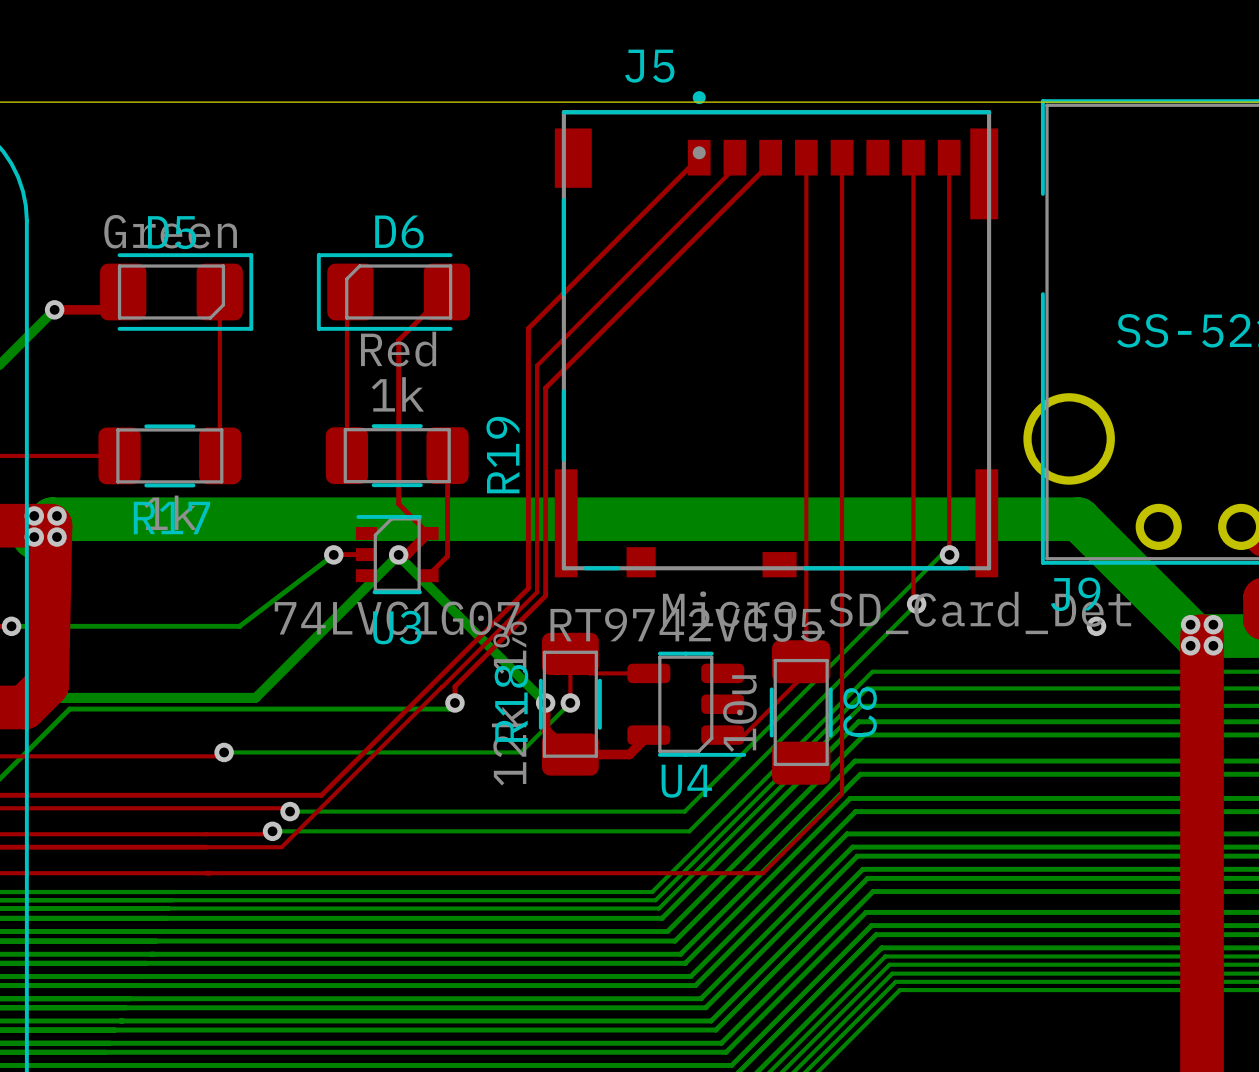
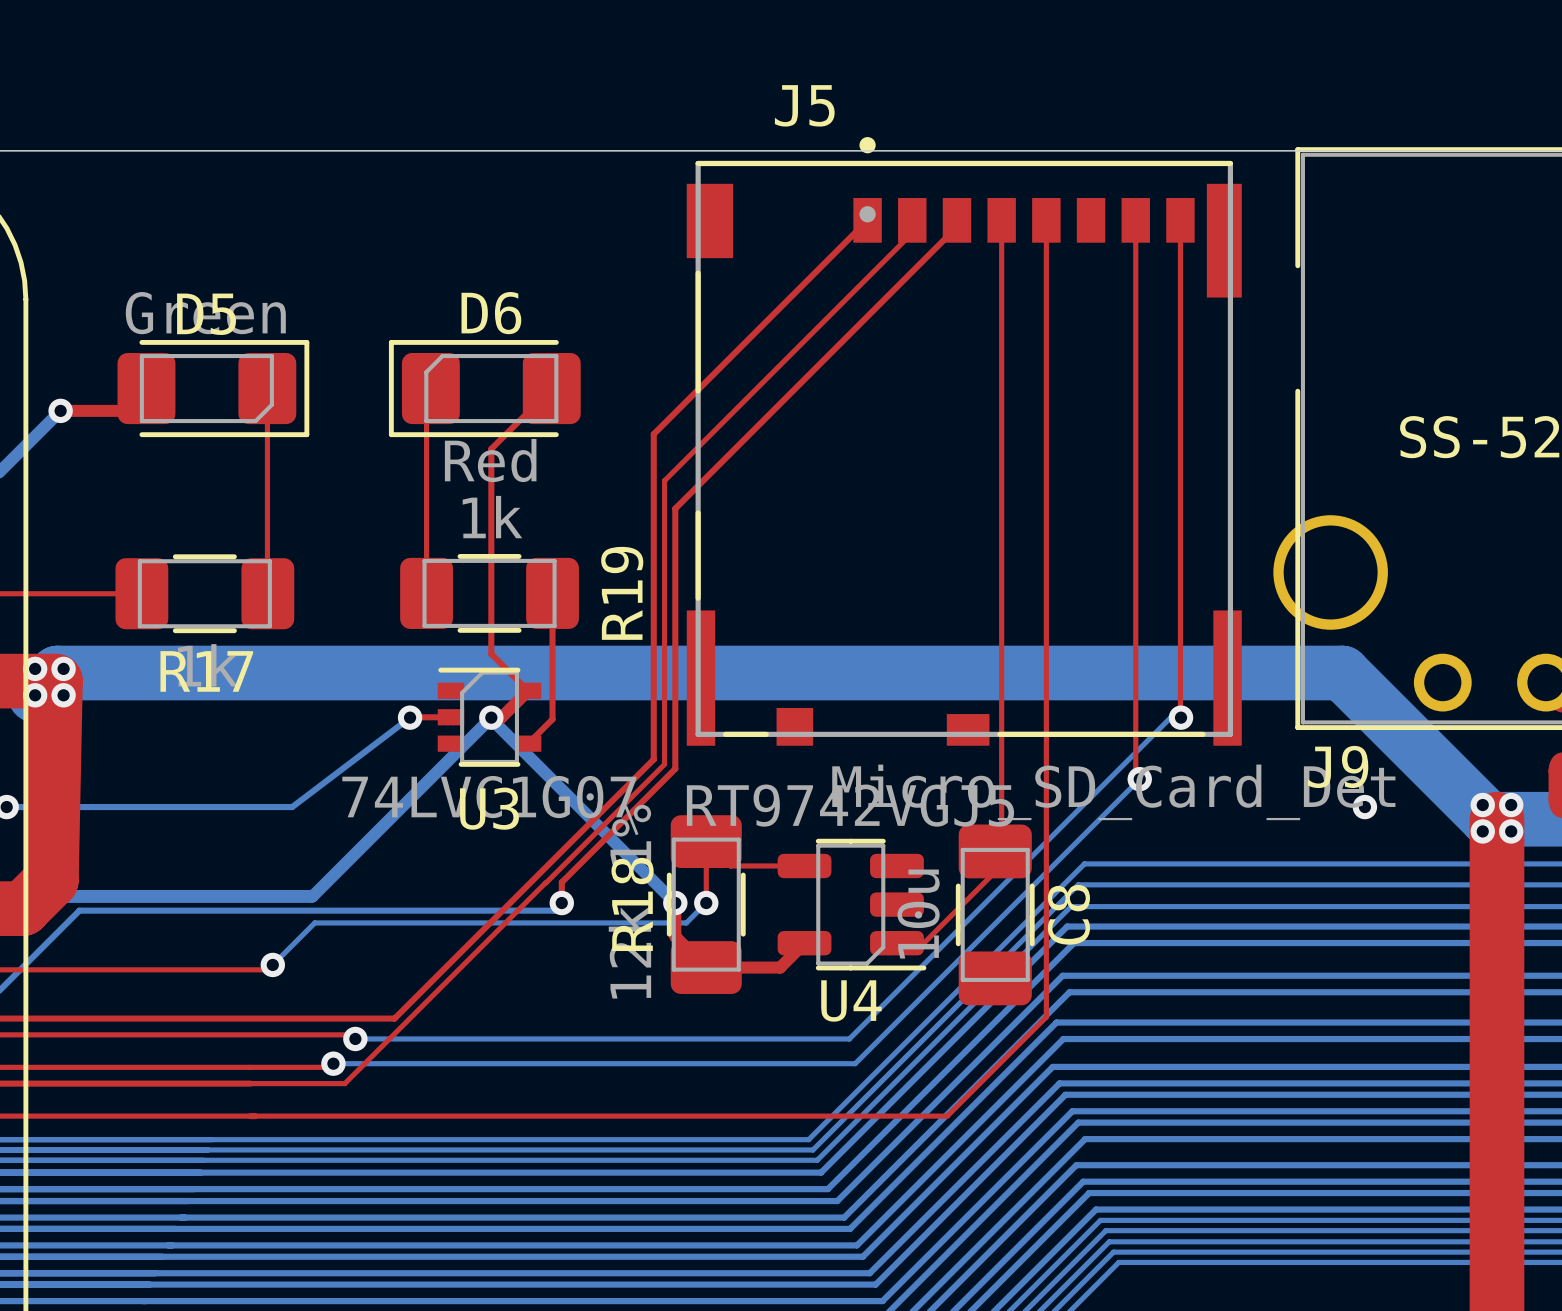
bottom track: (554, 718) (520, 752) (224, 752) -> (686, 922) (314, 922) (272, 964)

